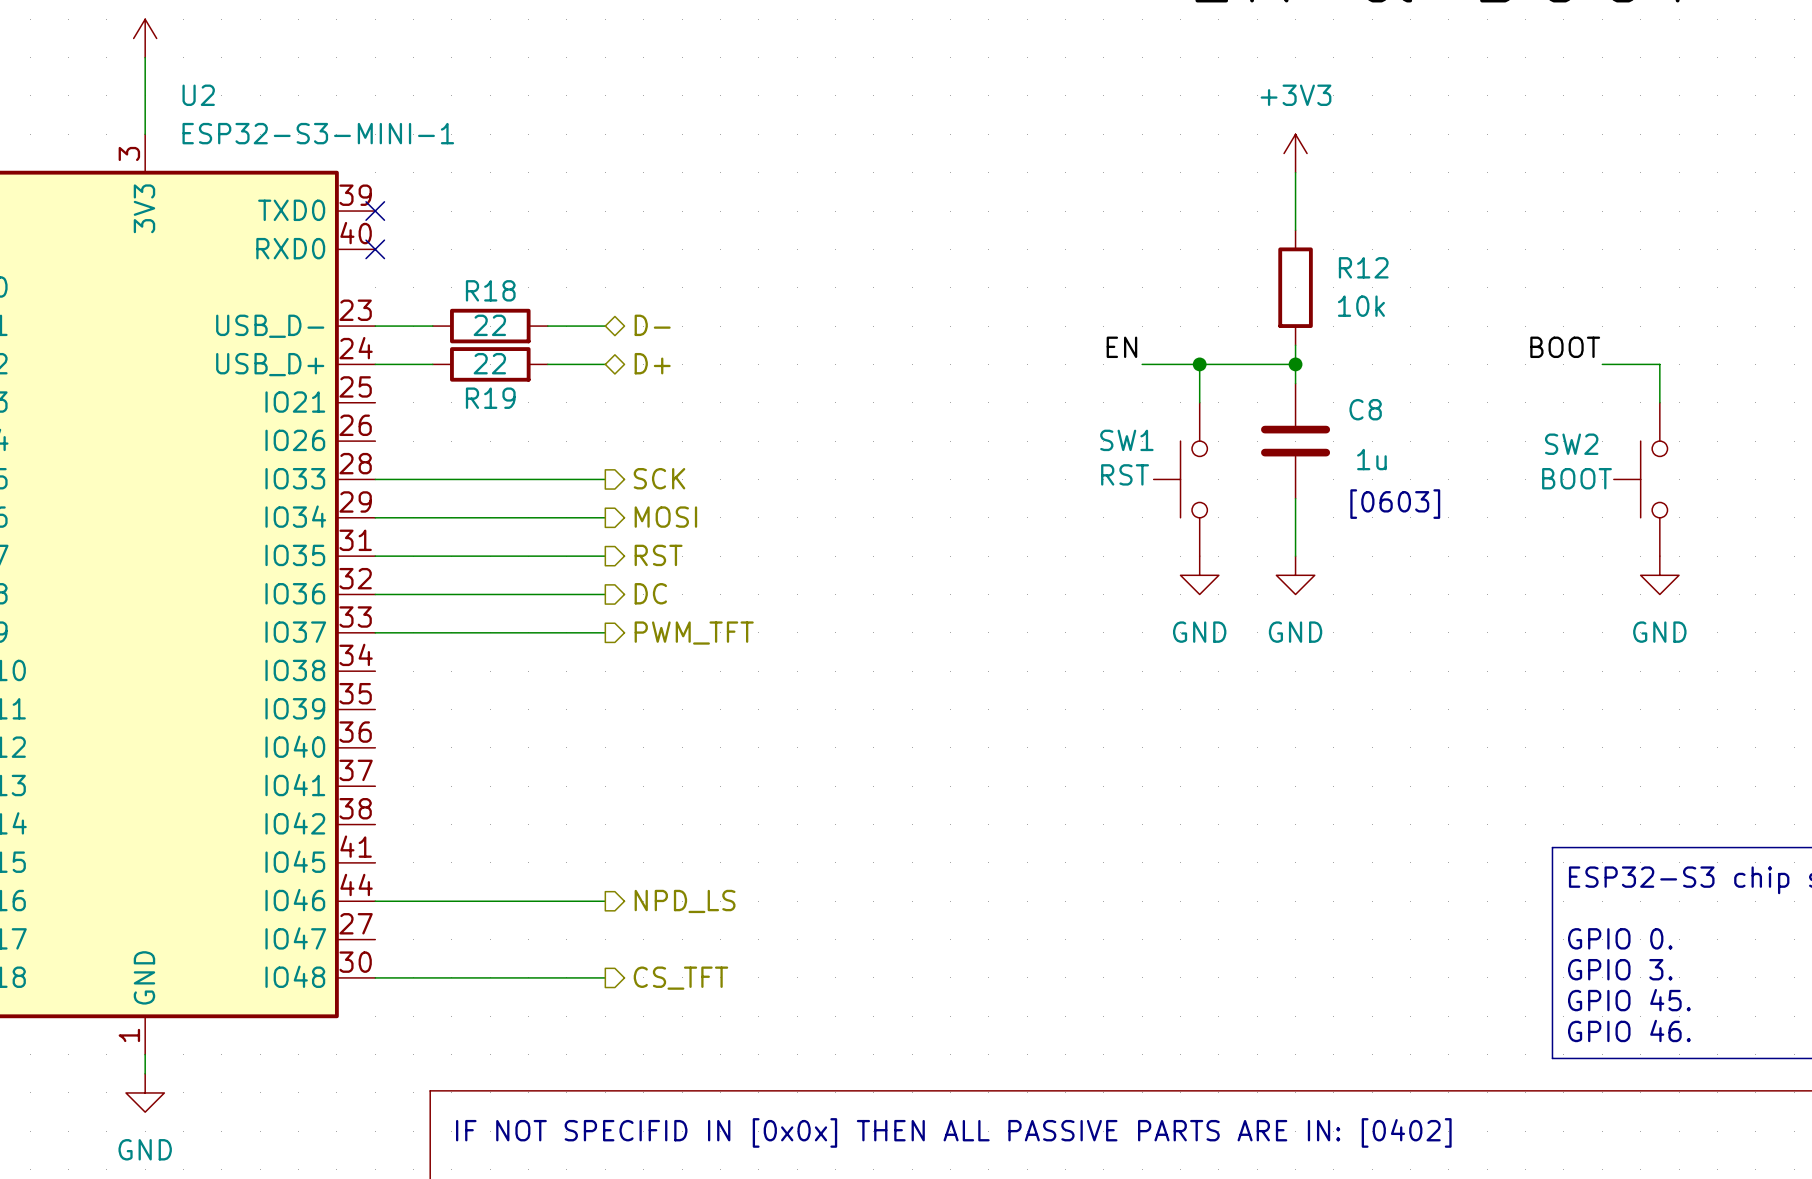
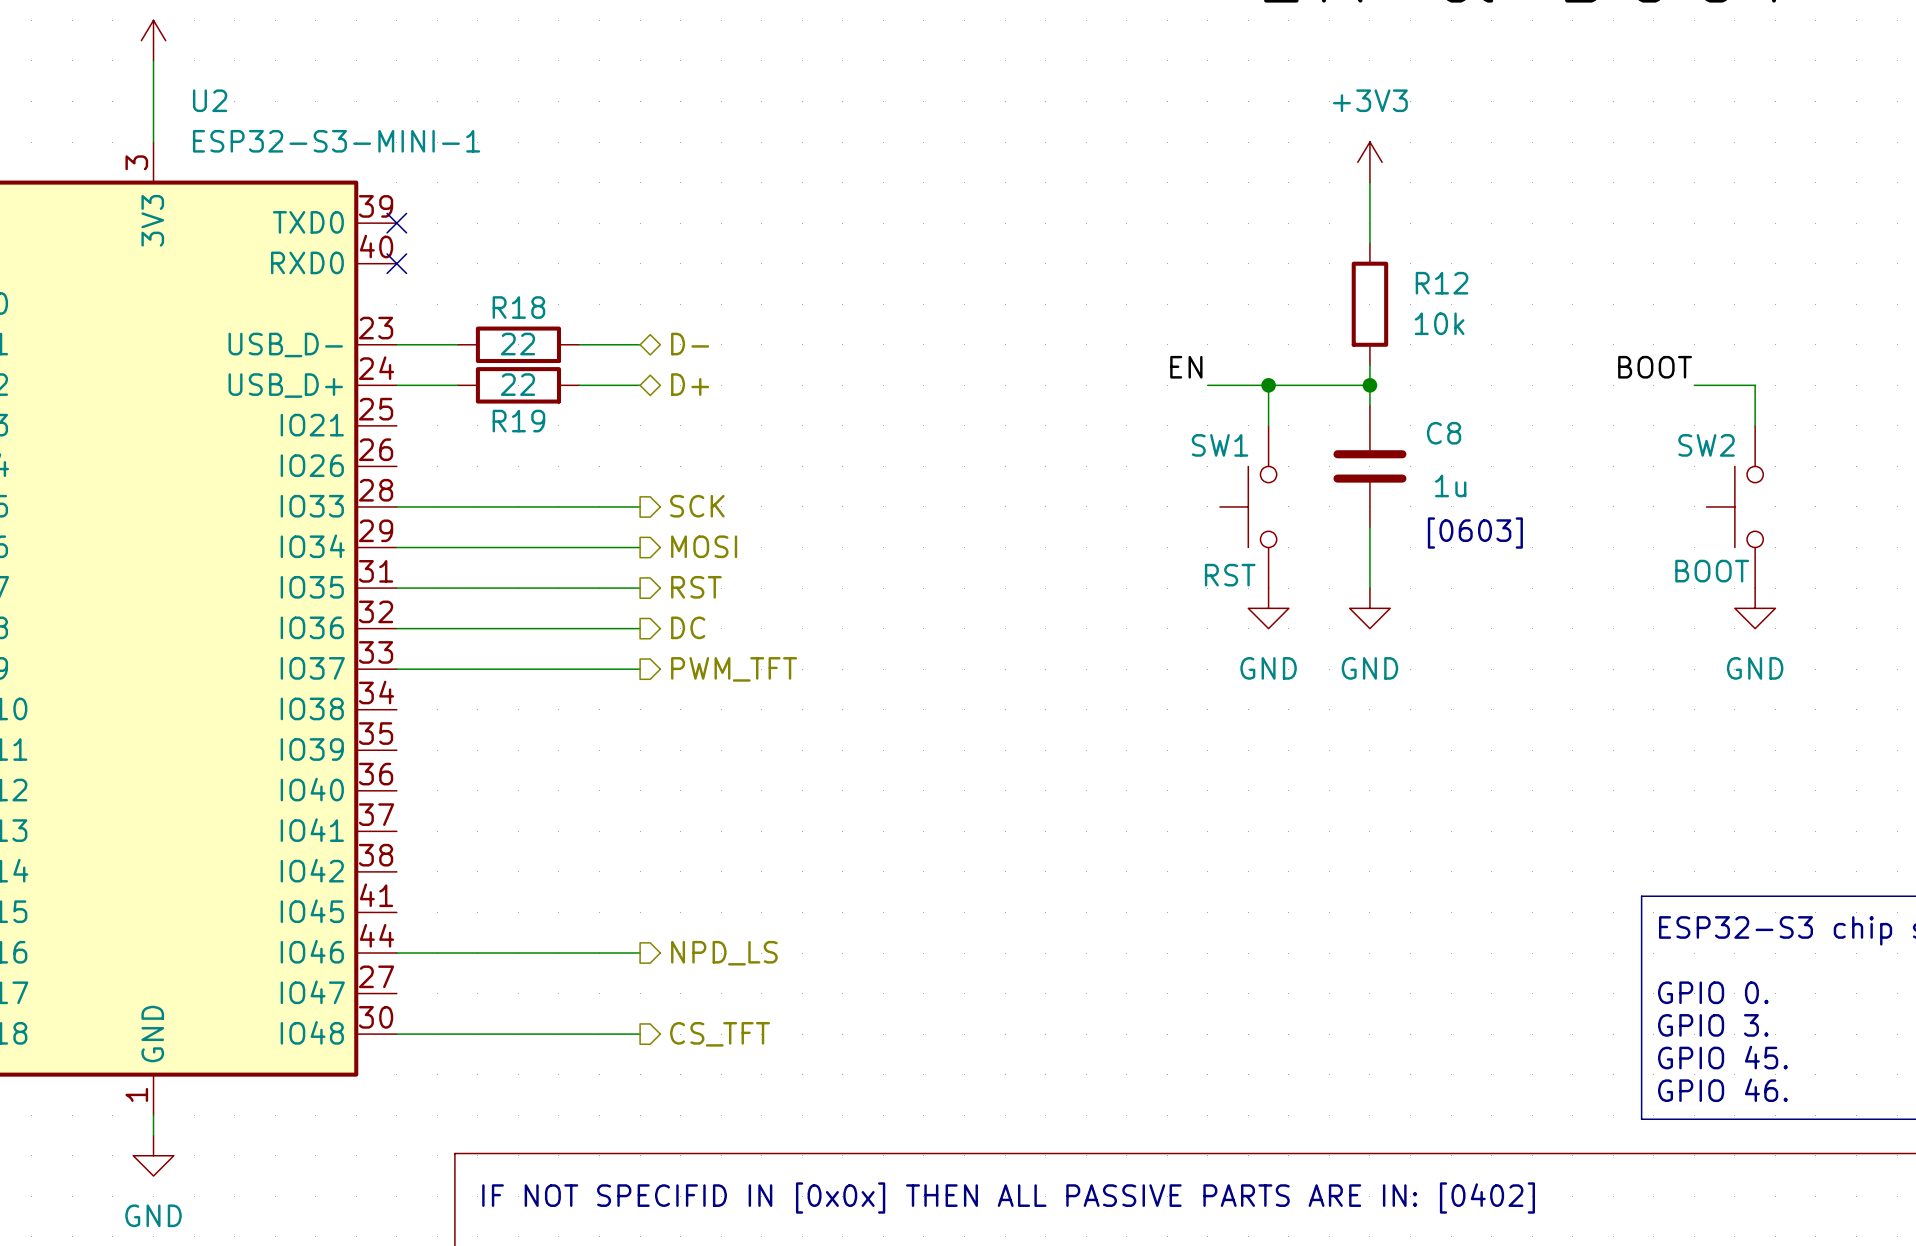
SW1 name position: SW1 (1126, 440) -> SW1 (1219, 445)
SW2 name position: SW2 (1571, 444) -> SW2 (1706, 445)
SW1 value position: RST (1125, 474) -> RST (1230, 575)
SW2 value position: BOOT (1576, 478) -> BOOT (1712, 571)

